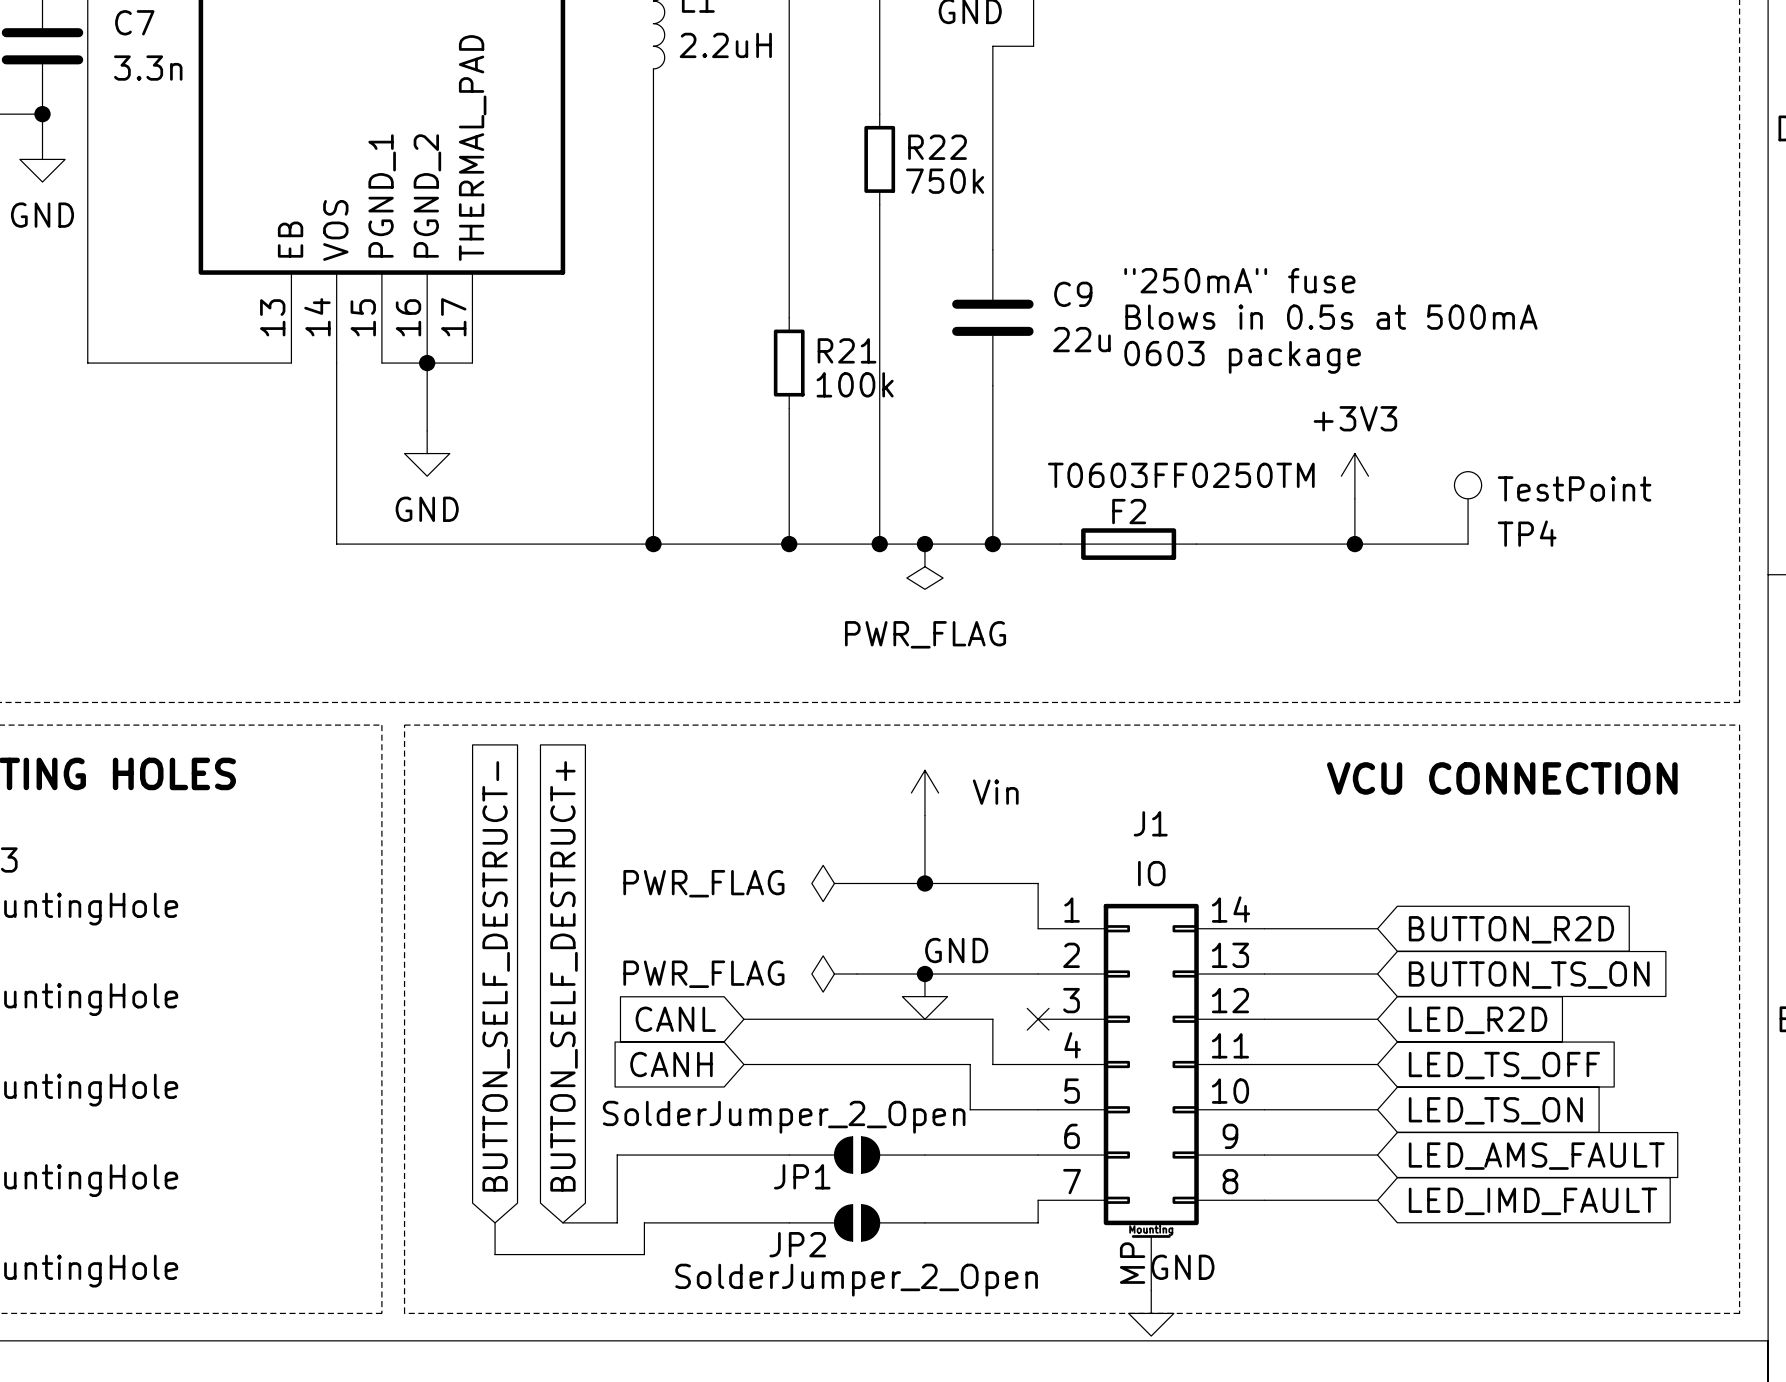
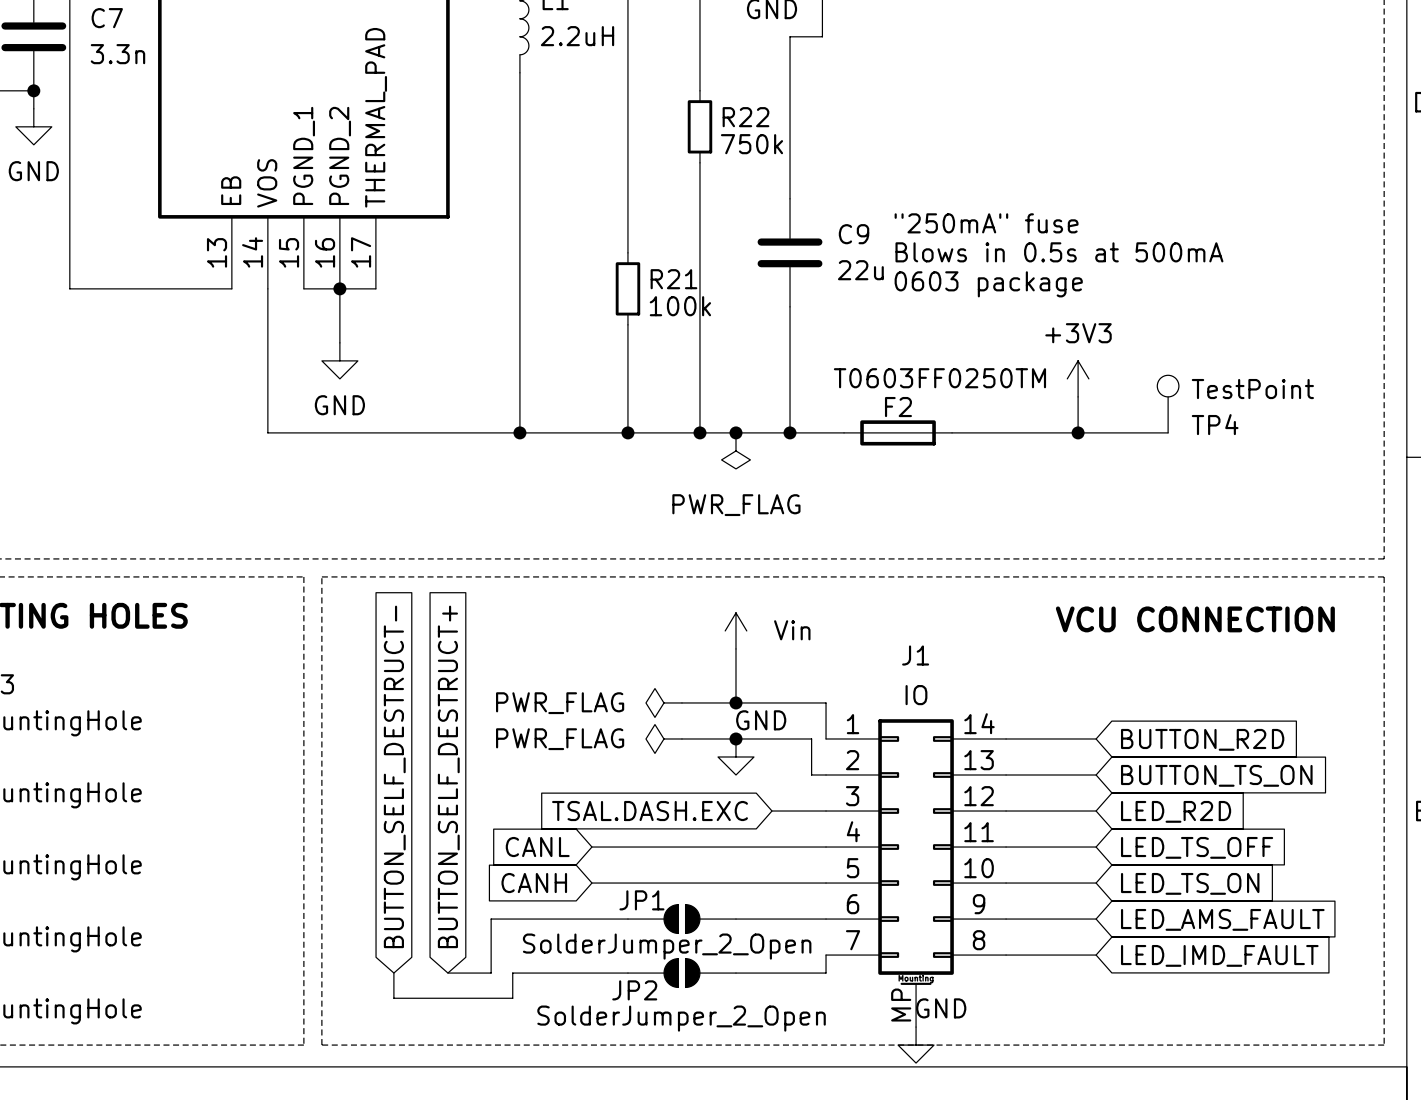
power symbol position: PWR_FLAG (834, 974) -> PWR_FLAG (663, 738)
wire: (857, 974) (1020, 974) -> (681, 738) (811, 738) (811, 775)
junction position: (924, 974) -> (735, 738)
power symbol position: GND (924, 996) -> GND (735, 756)
global label: CANL (675, 1019) -> none
wire: (743, 1019) (970, 1019) -> (591, 883) (772, 883)
global label: none -> TSAL.DASH.EXC (650, 811)
wire: (992, 1019) (992, 1064) -> (790, 811) (826, 811)
no-connect mark: (1038, 1019) -> none
global label: CANH (671, 1064) -> CANL (537, 847)
wire: (970, 1064) (970, 1109) -> (772, 847) (790, 847)
global label: none -> CANH (534, 883)
JP1 value position: SolderJumper_2_Open (784, 1117) -> SolderJumper_2_Open (667, 946)
JP1 name position: JP1 (802, 1176) -> JP1 (641, 900)

